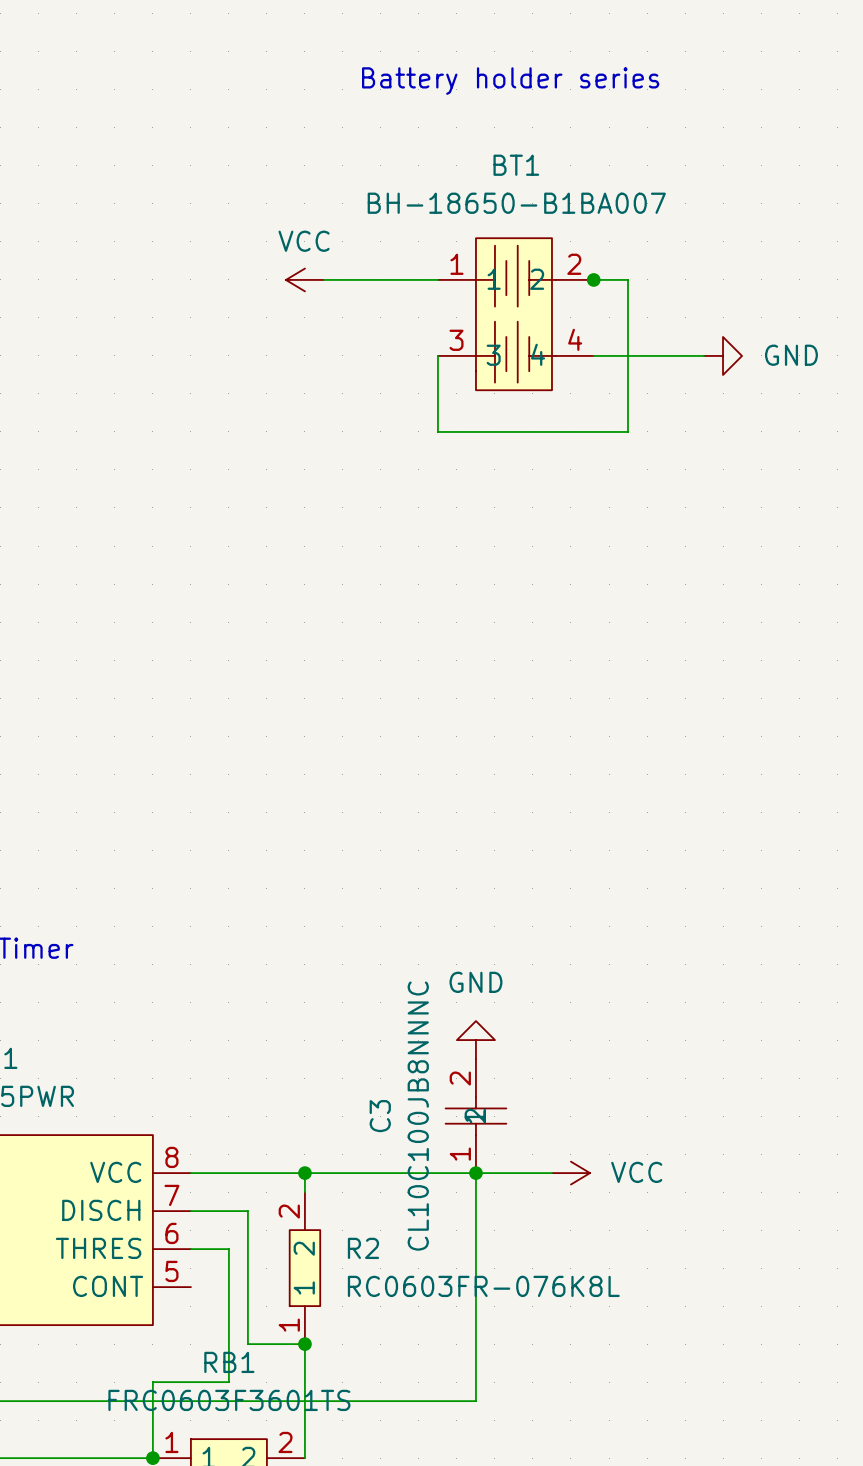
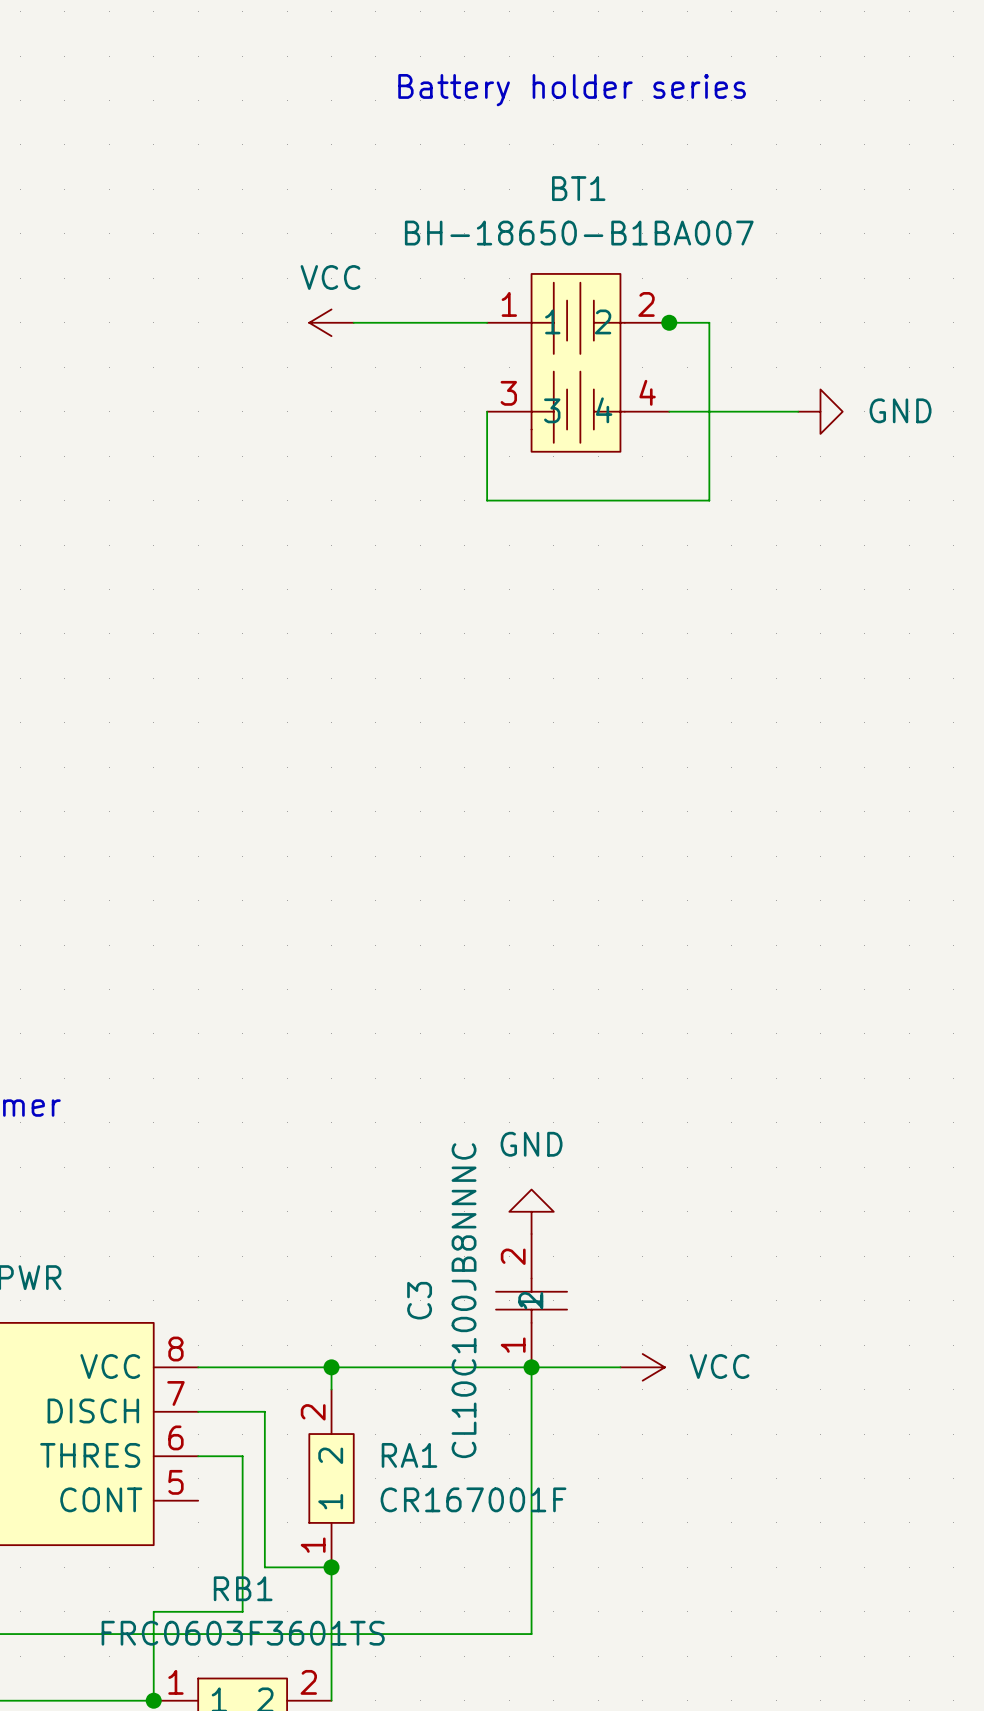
R2: RC0603FR-076K8L (304, 1268) -> none
RA1: none -> CR167001F (331, 1478)

